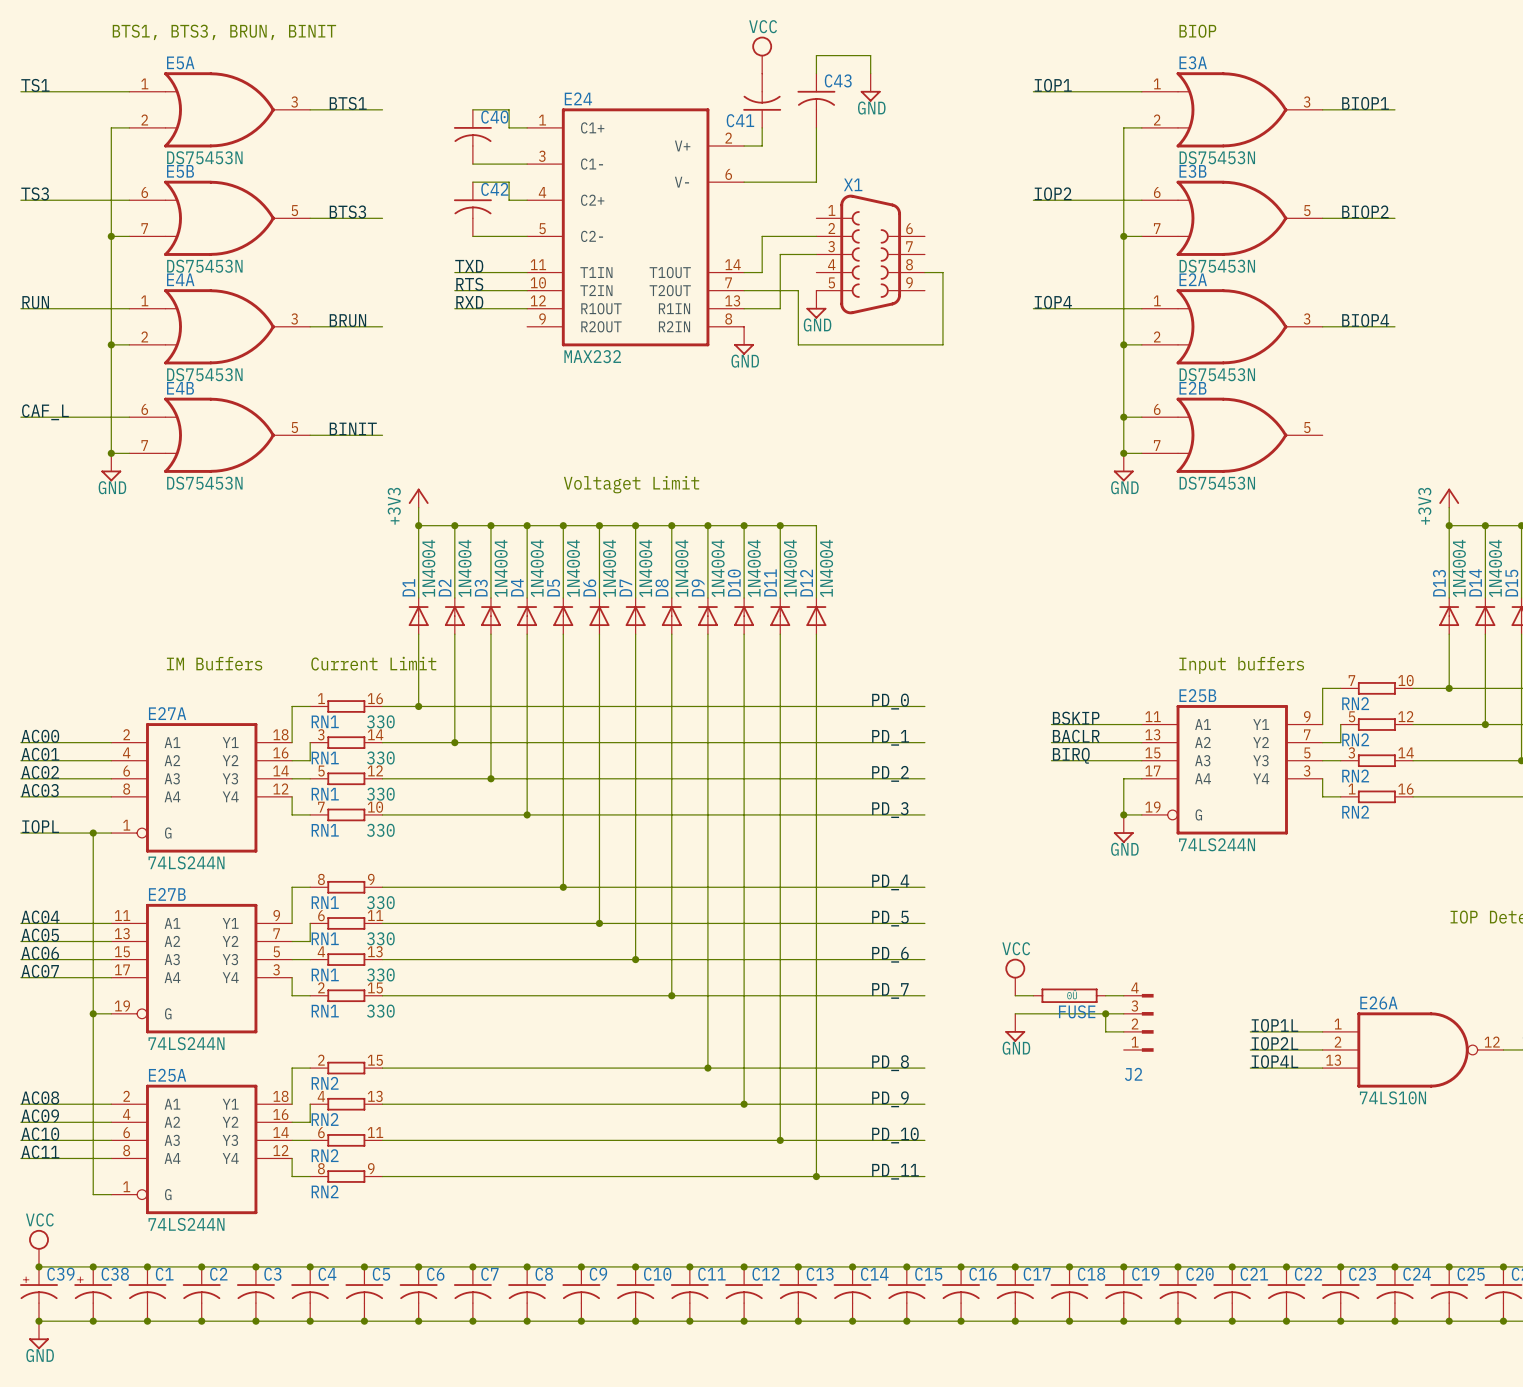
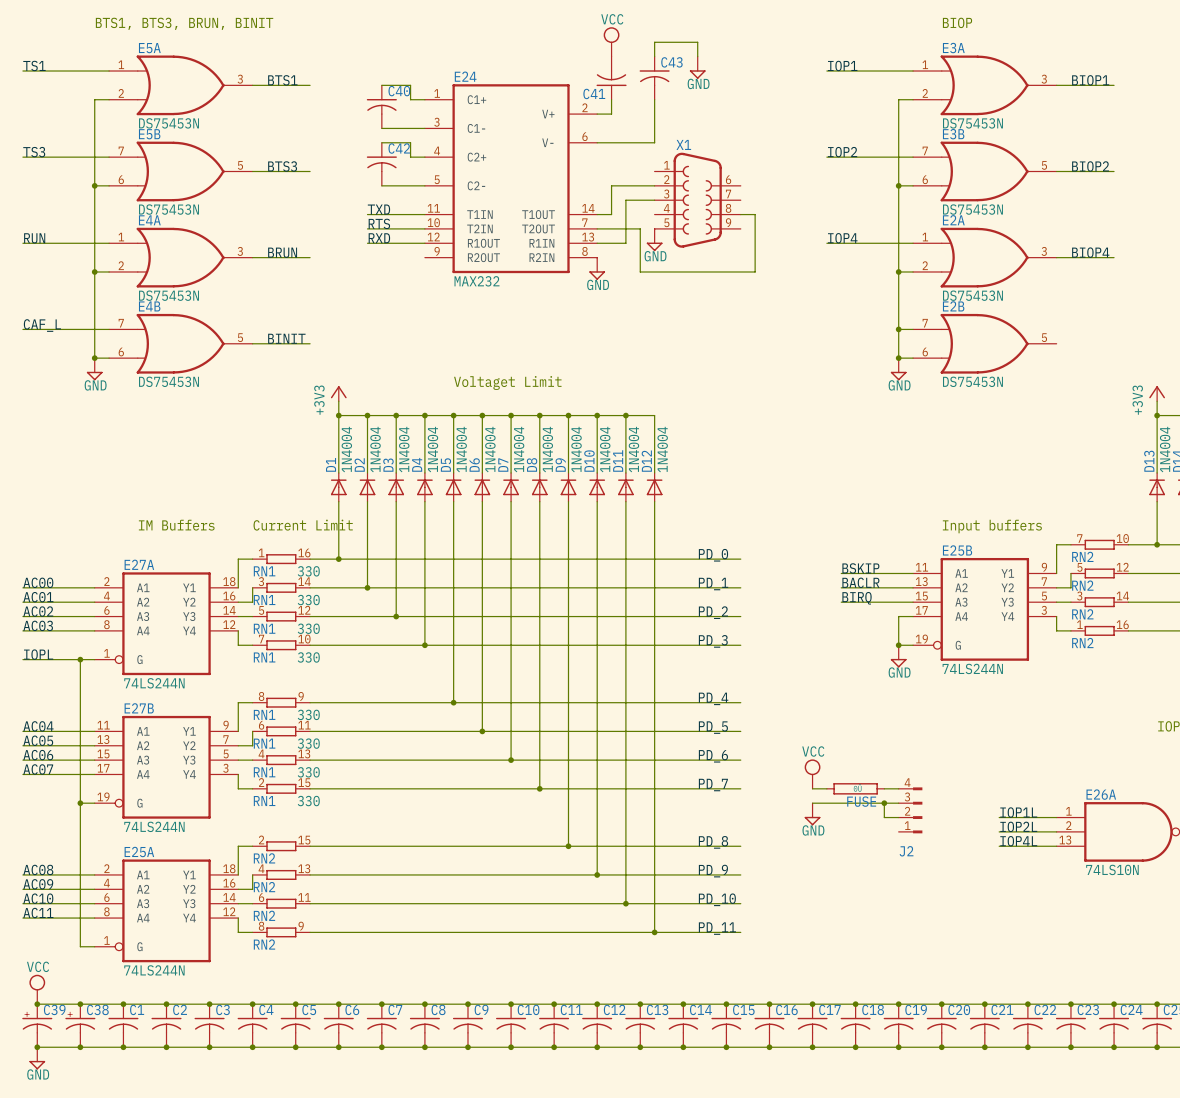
E5B symbol: [129, 180, 311, 256] -> [109, 141, 253, 202]
E3B symbol: [1141, 180, 1323, 256] -> [913, 141, 1057, 202]
E4B symbol: [129, 397, 311, 473] -> [109, 313, 253, 374]
E2B symbol: [1141, 397, 1323, 473] -> [913, 313, 1057, 374]

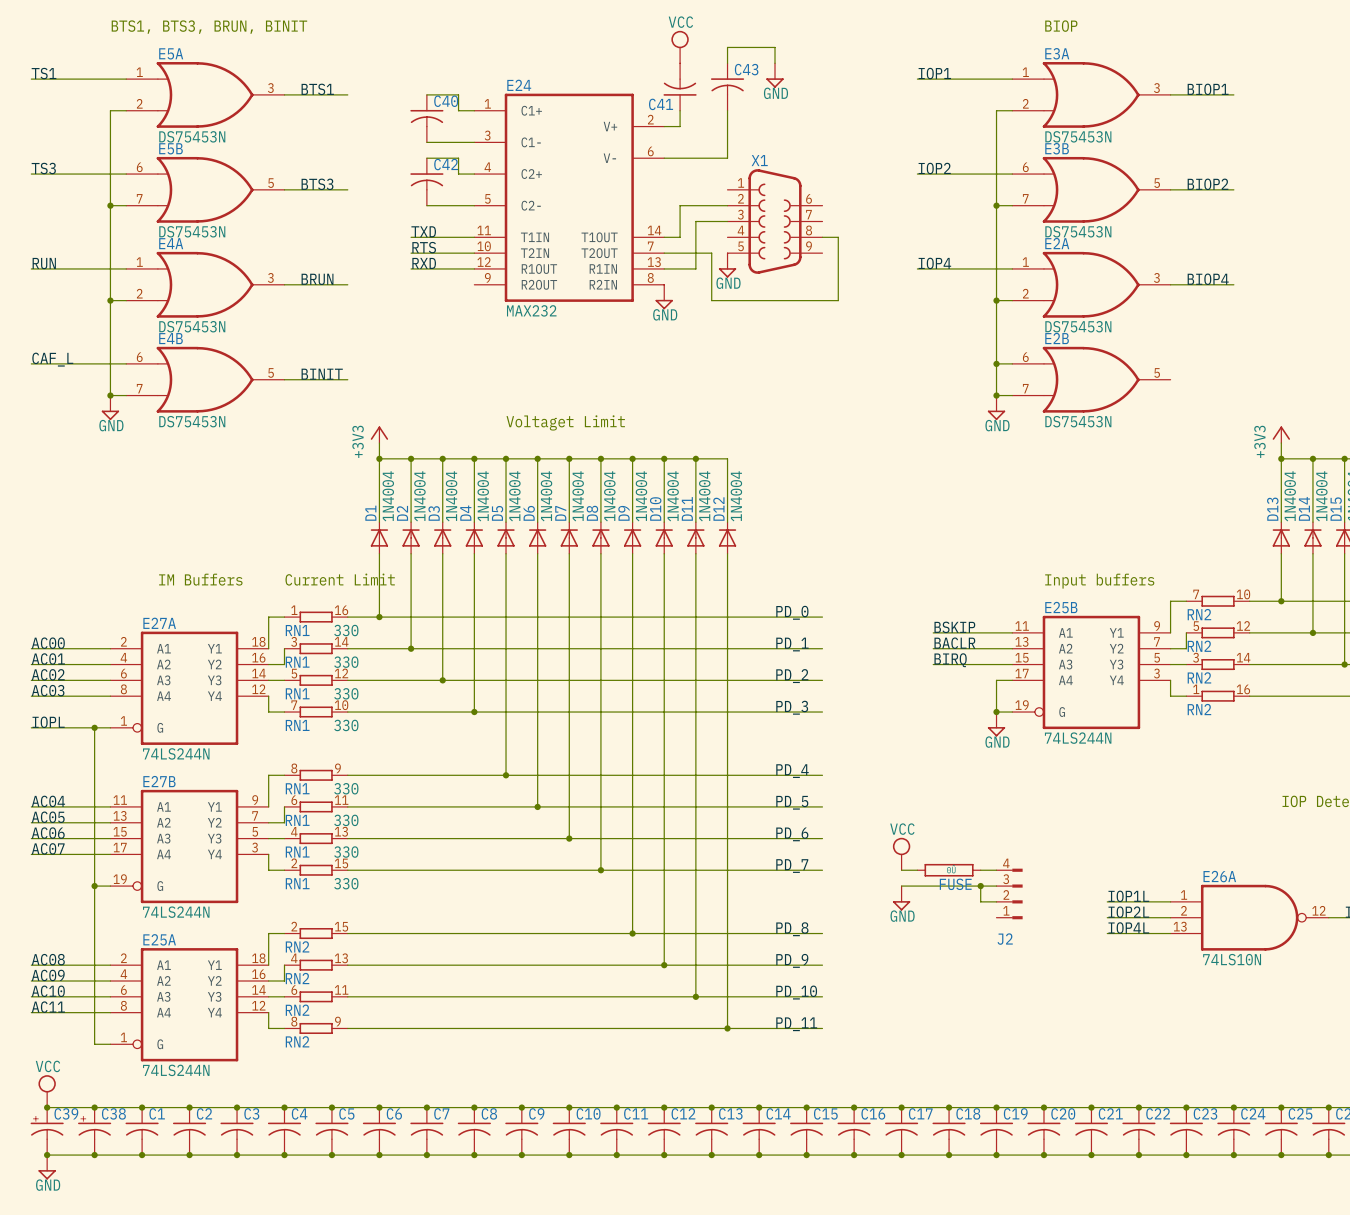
E5B symbol: [109, 141, 253, 202] -> [126, 156, 285, 223]
E3B symbol: [913, 141, 1057, 202] -> [1012, 156, 1171, 223]
E4B symbol: [109, 313, 253, 374] -> [126, 346, 285, 413]
E2B symbol: [913, 313, 1057, 374] -> [1012, 346, 1171, 413]

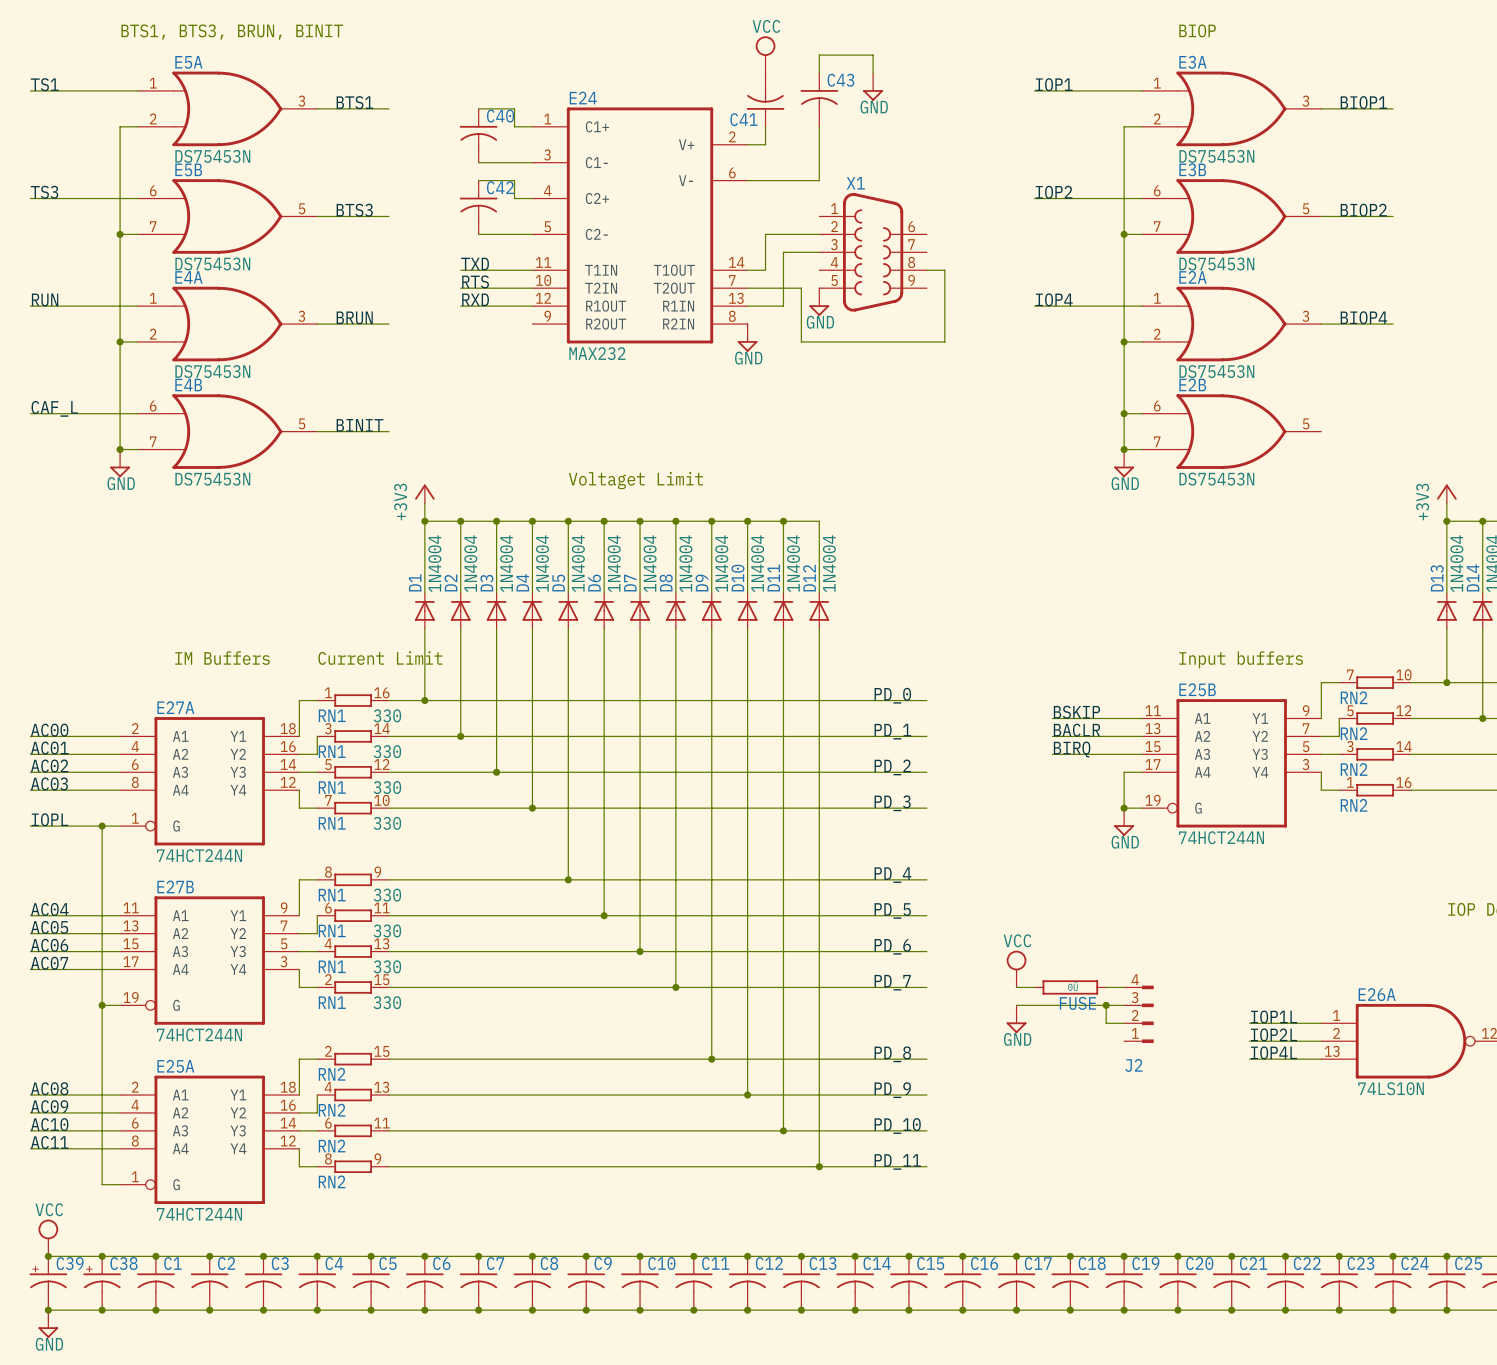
E25B value: 74LS244N (1078, 738) -> 74HCT244N (1221, 837)
E27A value: 74LS244N (176, 753) -> 74HCT244N (199, 855)
E27B value: 74LS244N (176, 912) -> 74HCT244N (199, 1034)
E25A value: 74LS244N (176, 1070) -> 74HCT244N (199, 1214)

